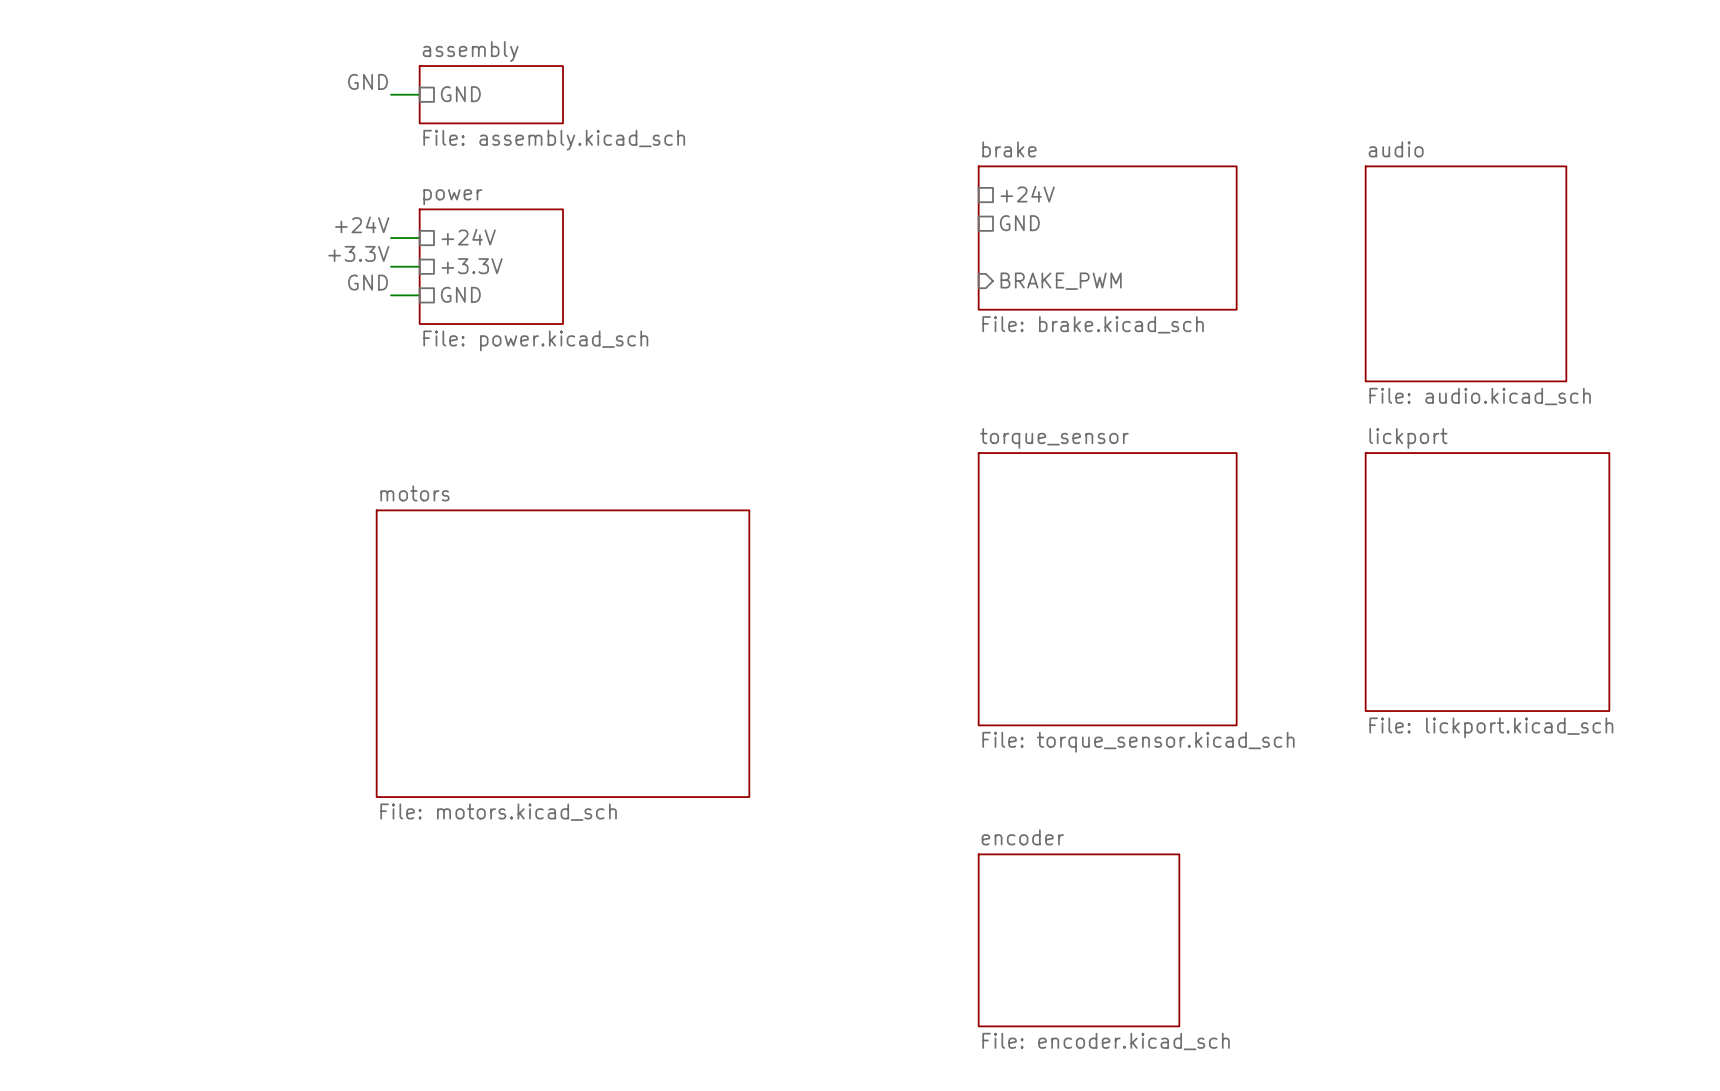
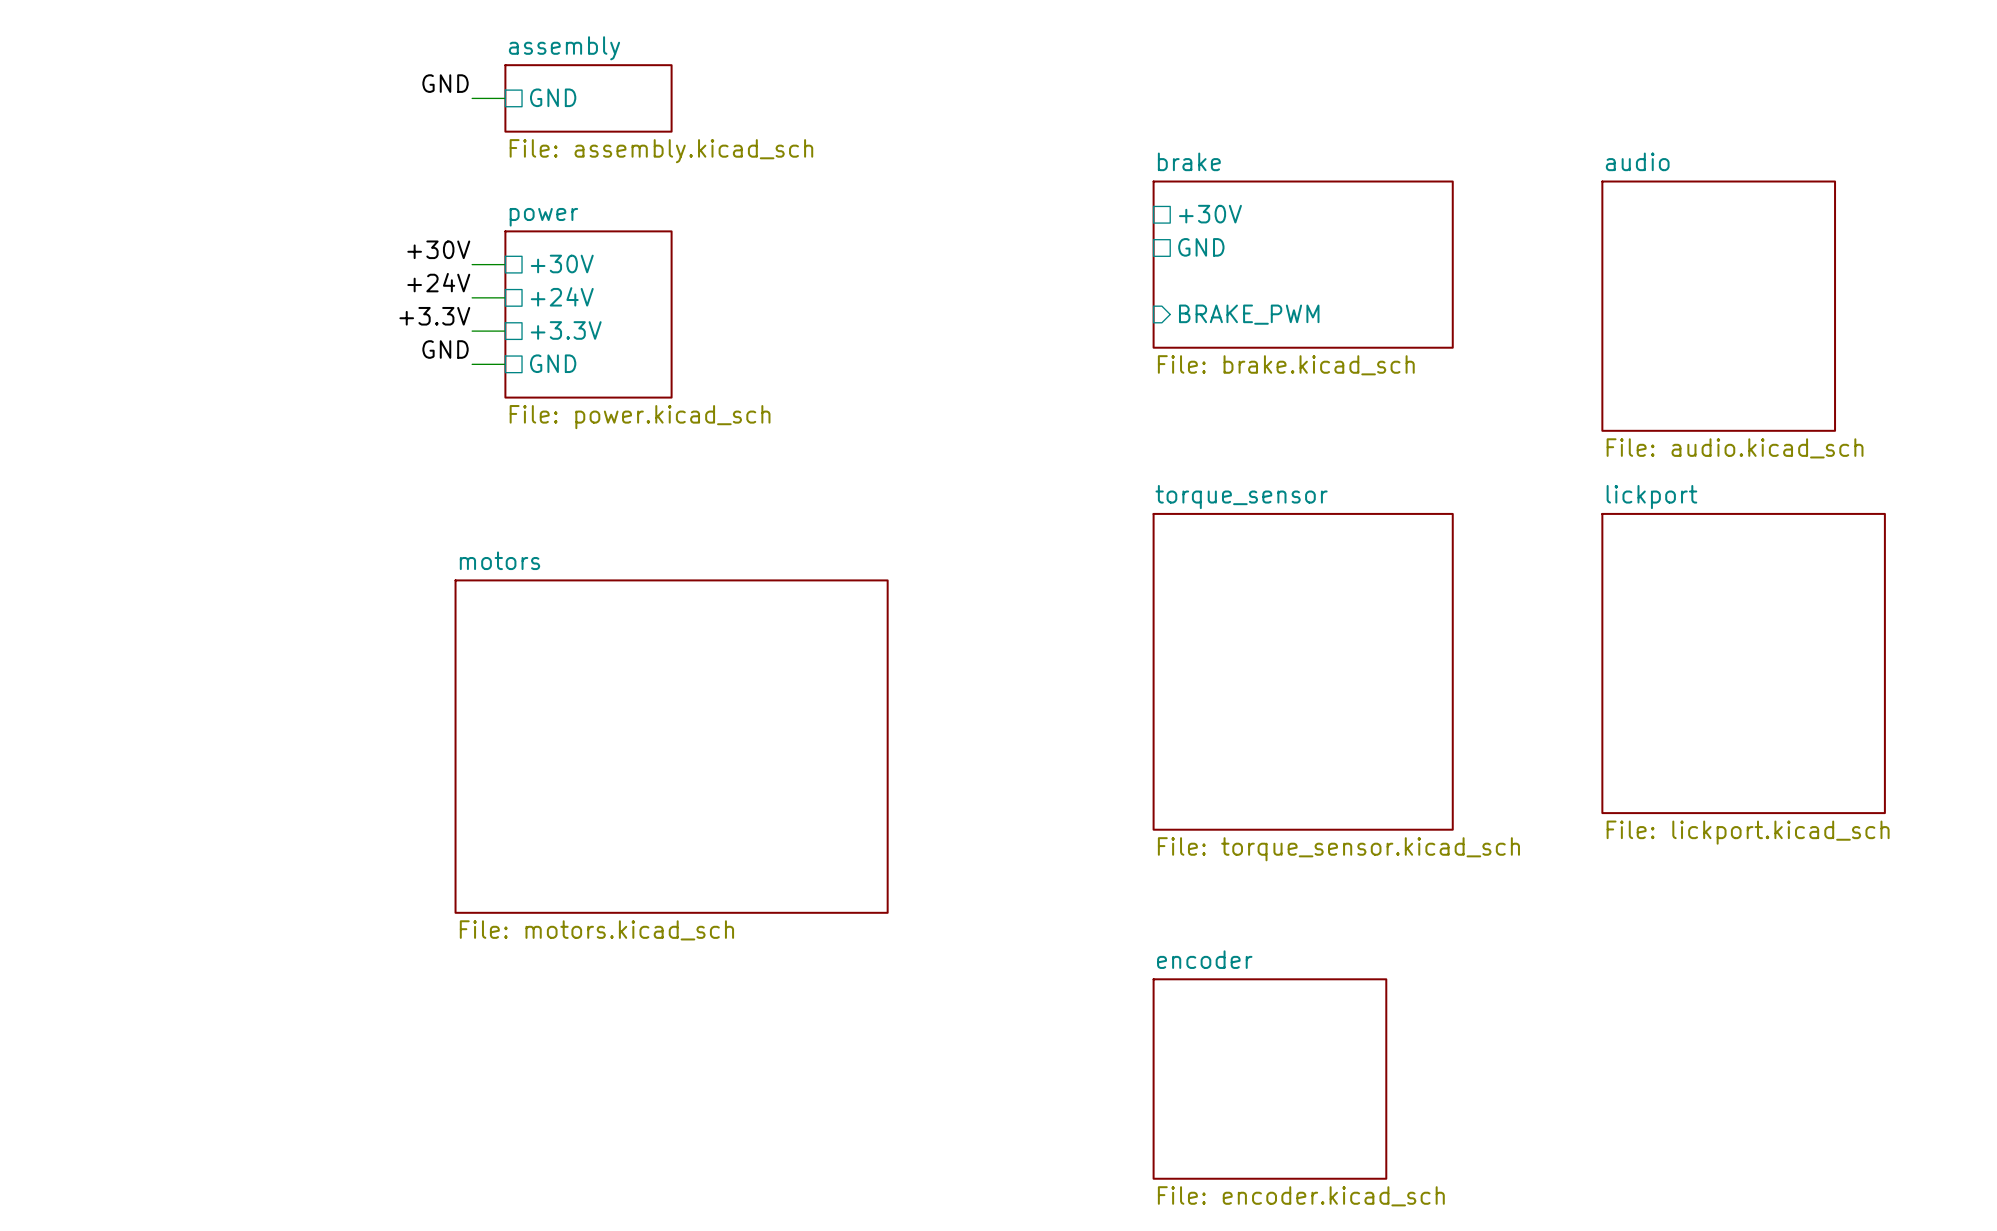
sheet pin: +24V (1027, 194) -> +30V (1210, 214)
label: +24V (362, 224) -> +30V (438, 249)
sheet pin: +24V (468, 237) -> +30V (562, 263)
label: +3.3V (358, 253) -> +24V (438, 282)
sheet pin: +3.3V (472, 266) -> +24V (562, 296)
sheet power: File: power.kicad_sch (491, 266) -> none
sheet power: none -> File: power.kicad_sch (588, 314)
label: GND (368, 282) -> +3.3V (434, 316)
sheet pin: GND (460, 294) -> +3.3V (566, 330)
label: none -> GND (445, 349)
sheet pin: none -> GND (553, 363)
wire: none -> (472, 364) (505, 364)

